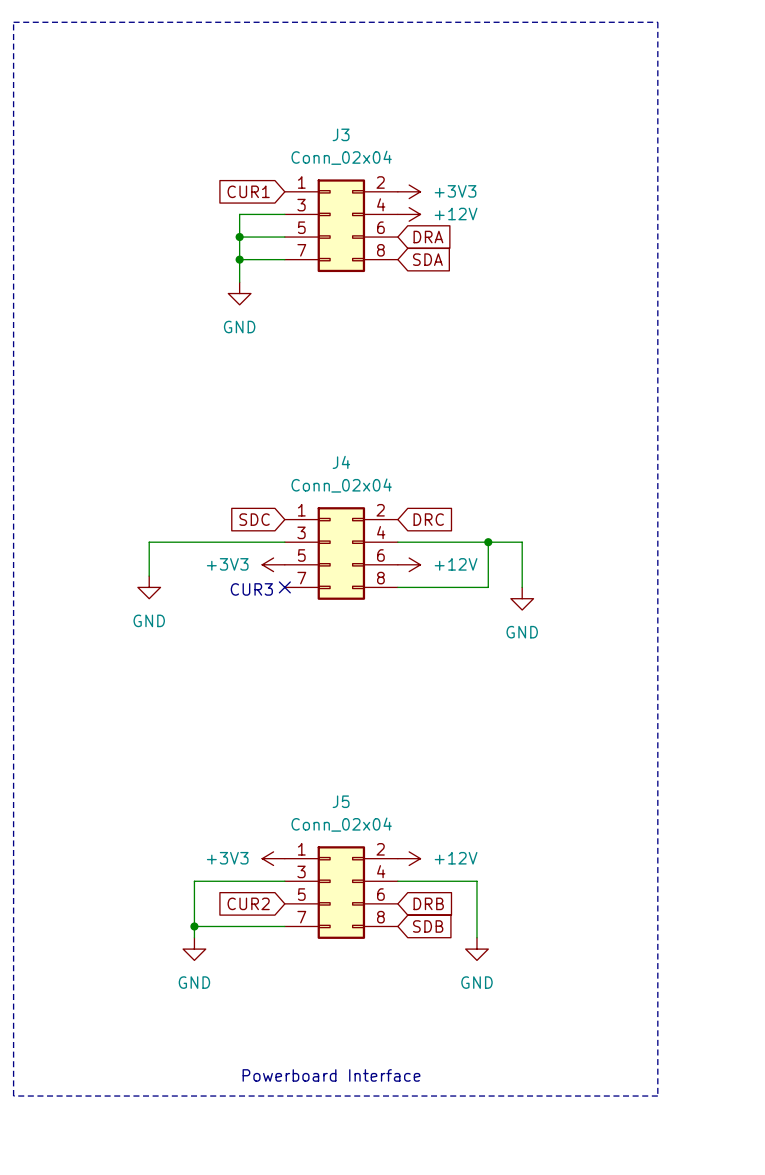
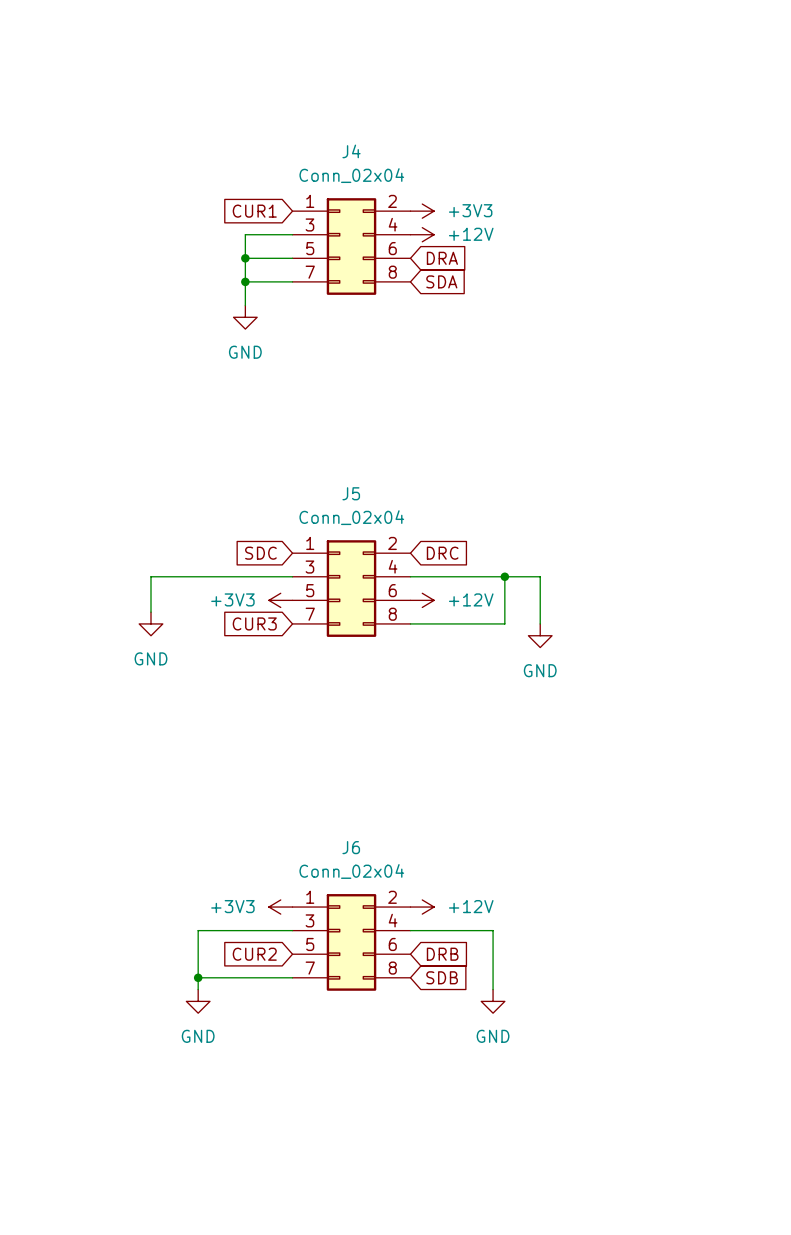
line: (13, 22) (657, 22) (657, 1096) (13, 1096) (13, 22) -> none
J3 name: J3 (341, 134) -> J4 (351, 151)
J4 name: J4 (341, 462) -> J5 (351, 493)
global label: none -> CUR3 (254, 623)
no-connect mark: (284, 587) -> none
text: CUR3 (251, 589) -> none
J5 name: J5 (341, 801) -> J6 (351, 847)
text: Powerboard Interface (331, 1075) -> none

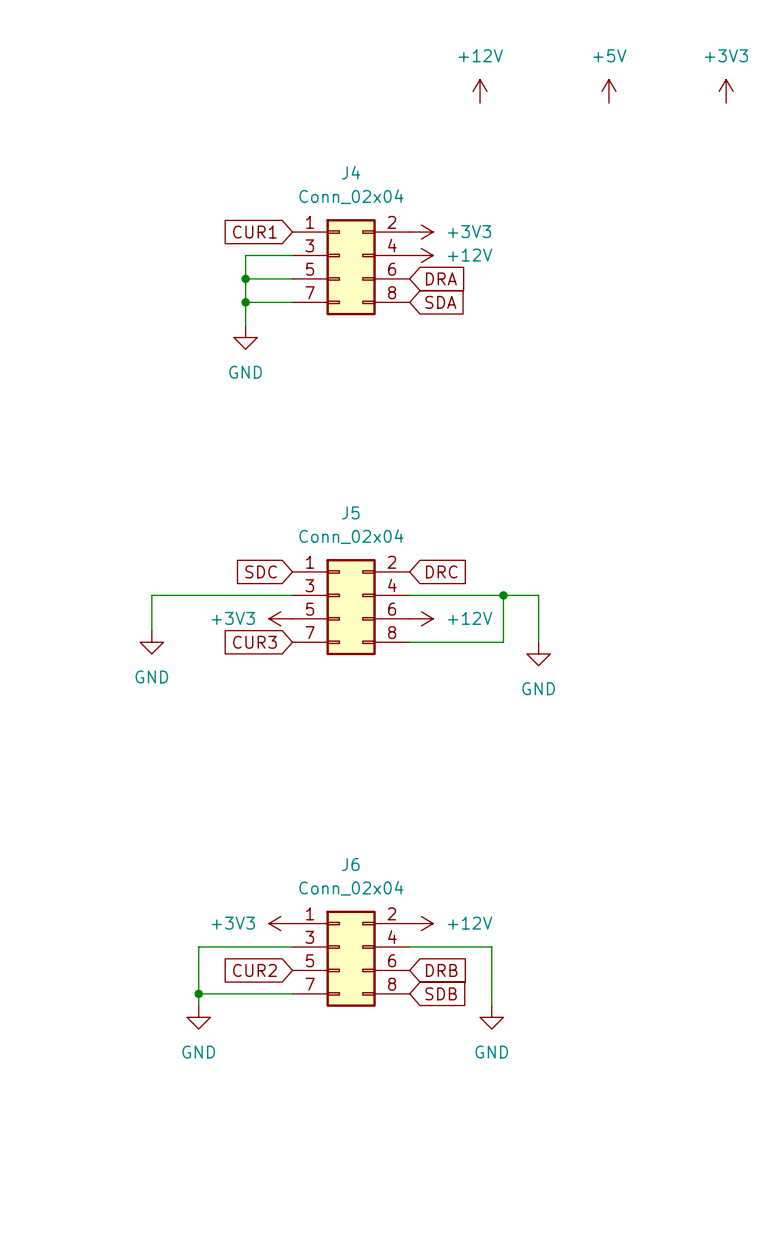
power symbol: none -> +12V (480, 91)
power symbol: none -> +5V (608, 91)
power symbol: none -> +3V3 (726, 91)

